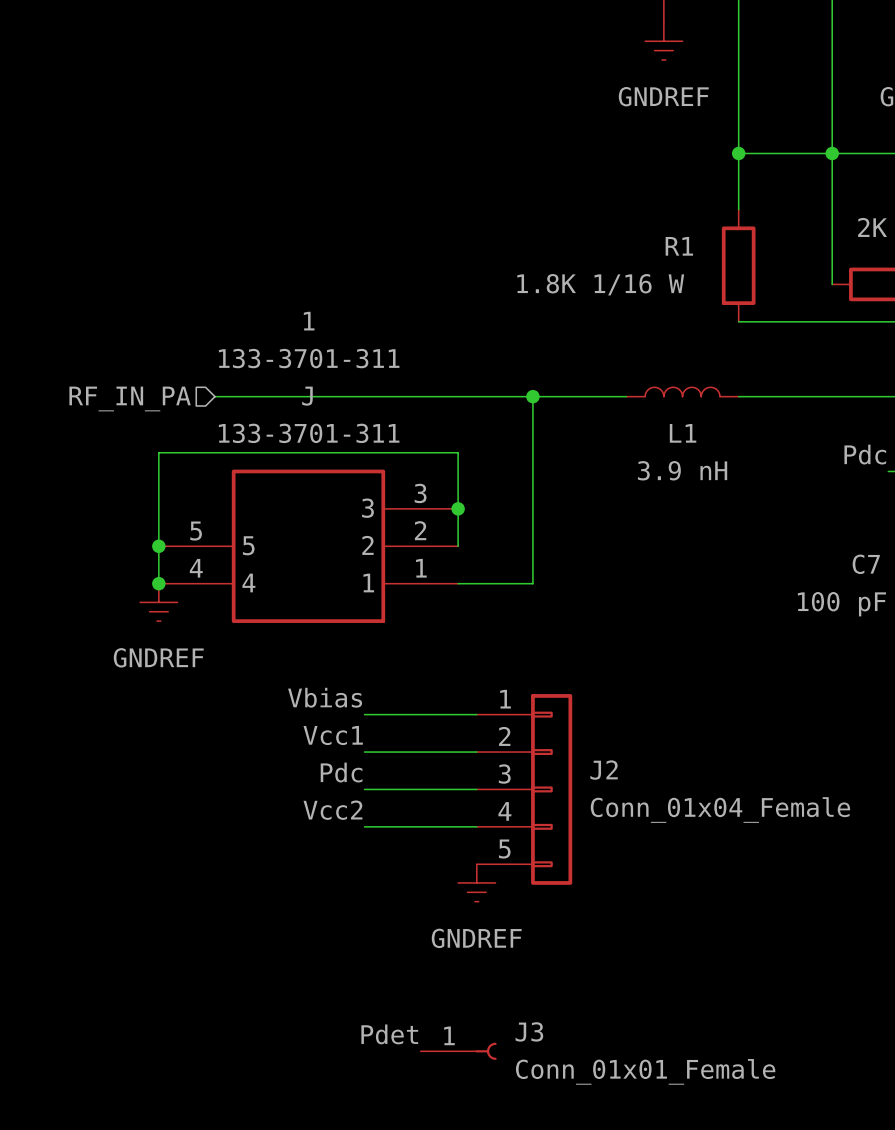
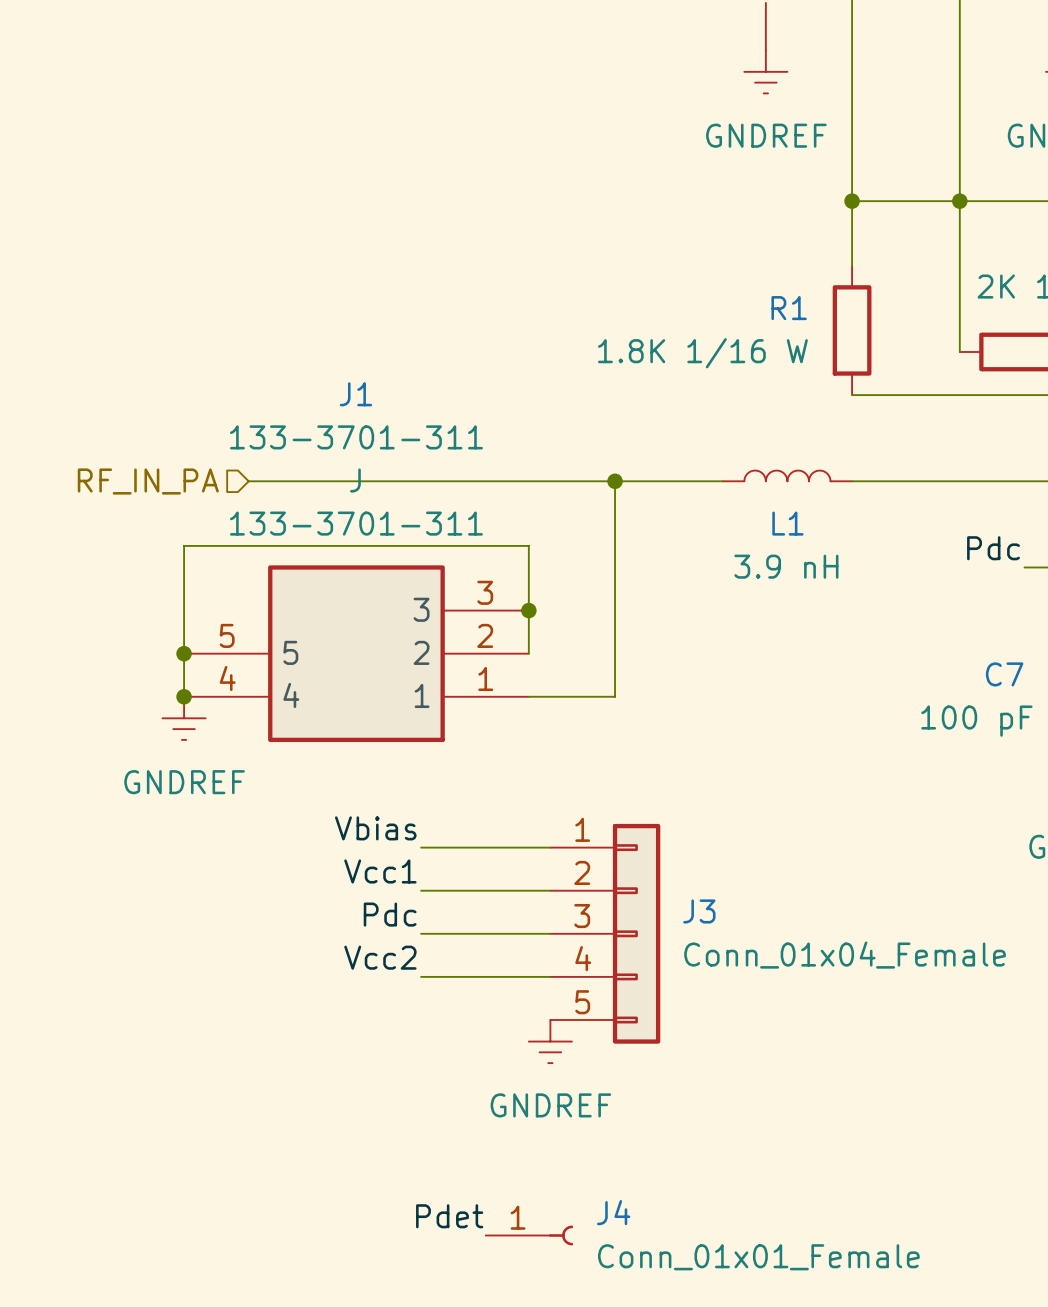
1 name: 1 (309, 321) -> J1 (355, 394)
J2 name: J2 (604, 770) -> J3 (699, 911)
J3 name: J3 (529, 1031) -> J4 (613, 1212)

